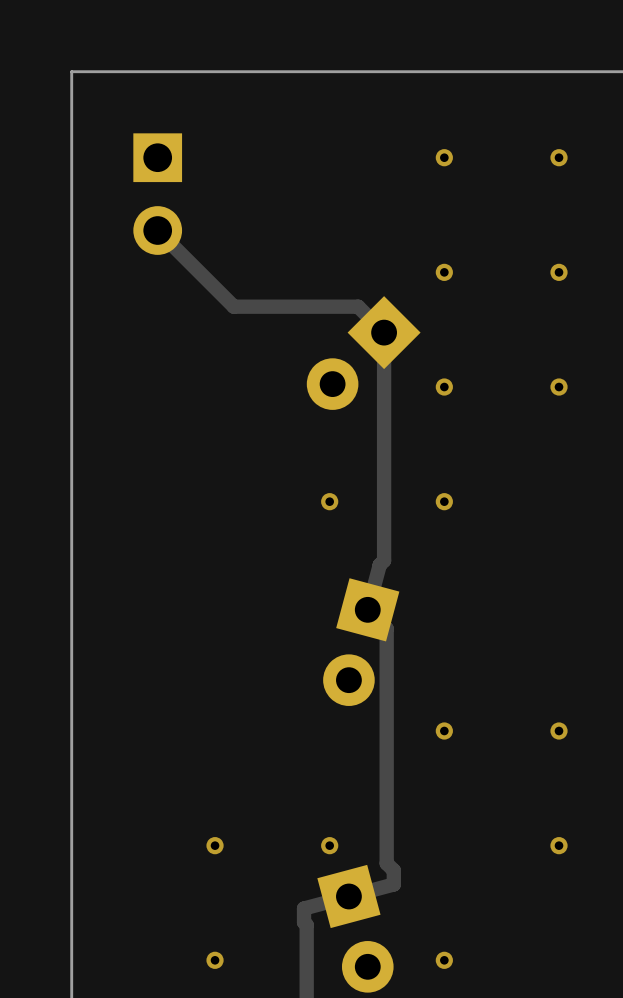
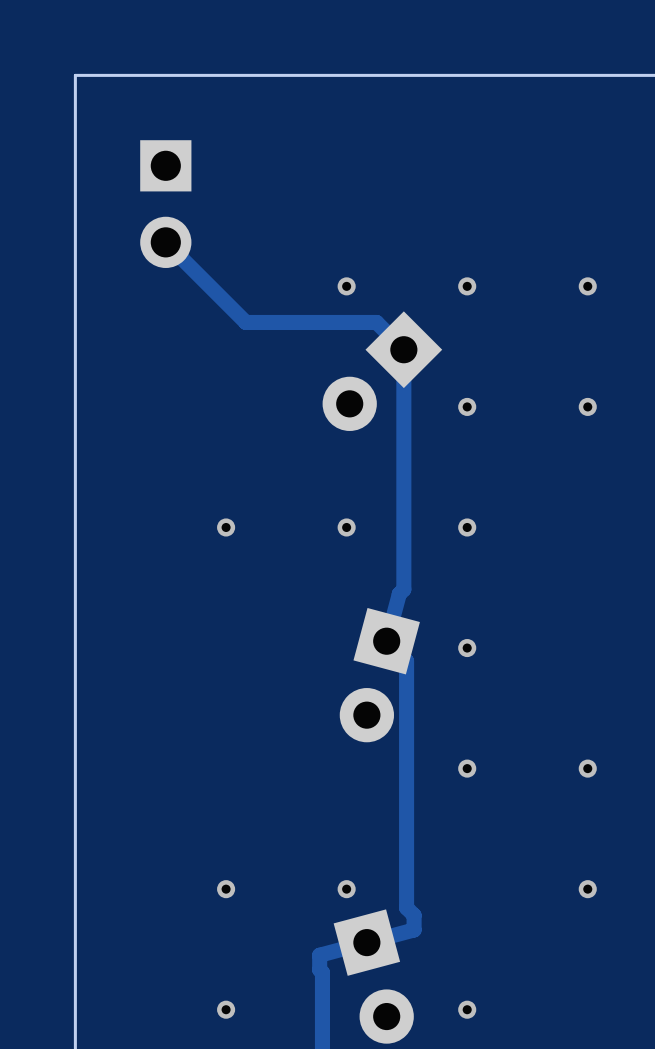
via: (444, 157) -> none
via: (559, 157) -> none
via: none -> (346, 286)
via: none -> (226, 527)
via: none -> (467, 648)

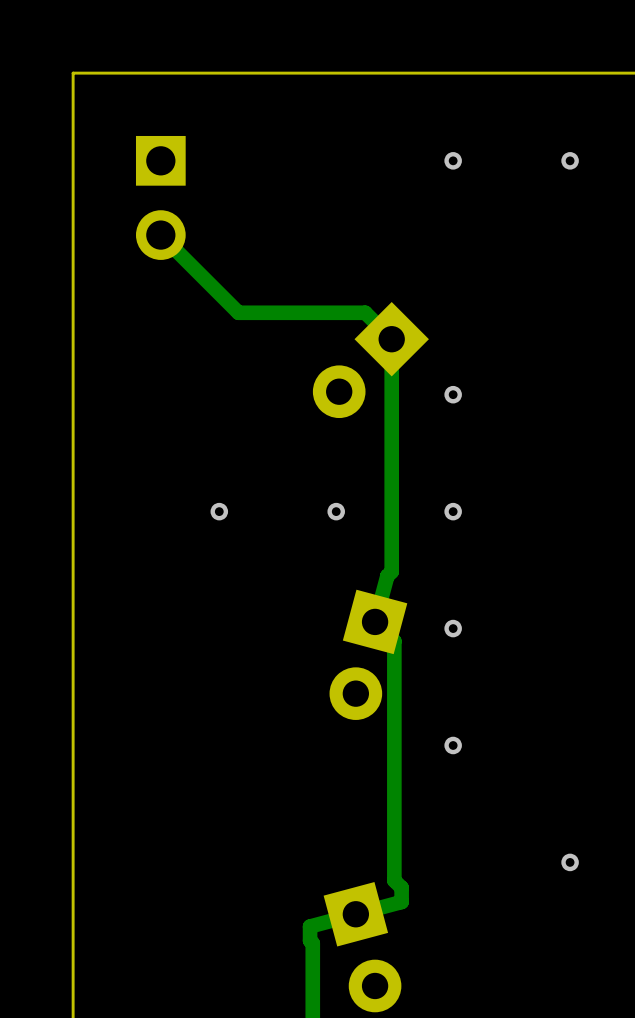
via: none -> (453, 160)
via: none -> (570, 160)
via: (346, 286) -> none
via: (467, 286) -> none
via: (587, 286) -> none
via: (587, 406) -> none
via: (587, 768) -> none
via: (226, 889) -> none
via: (346, 889) -> none
via: (226, 1009) -> none
via: (467, 1009) -> none

